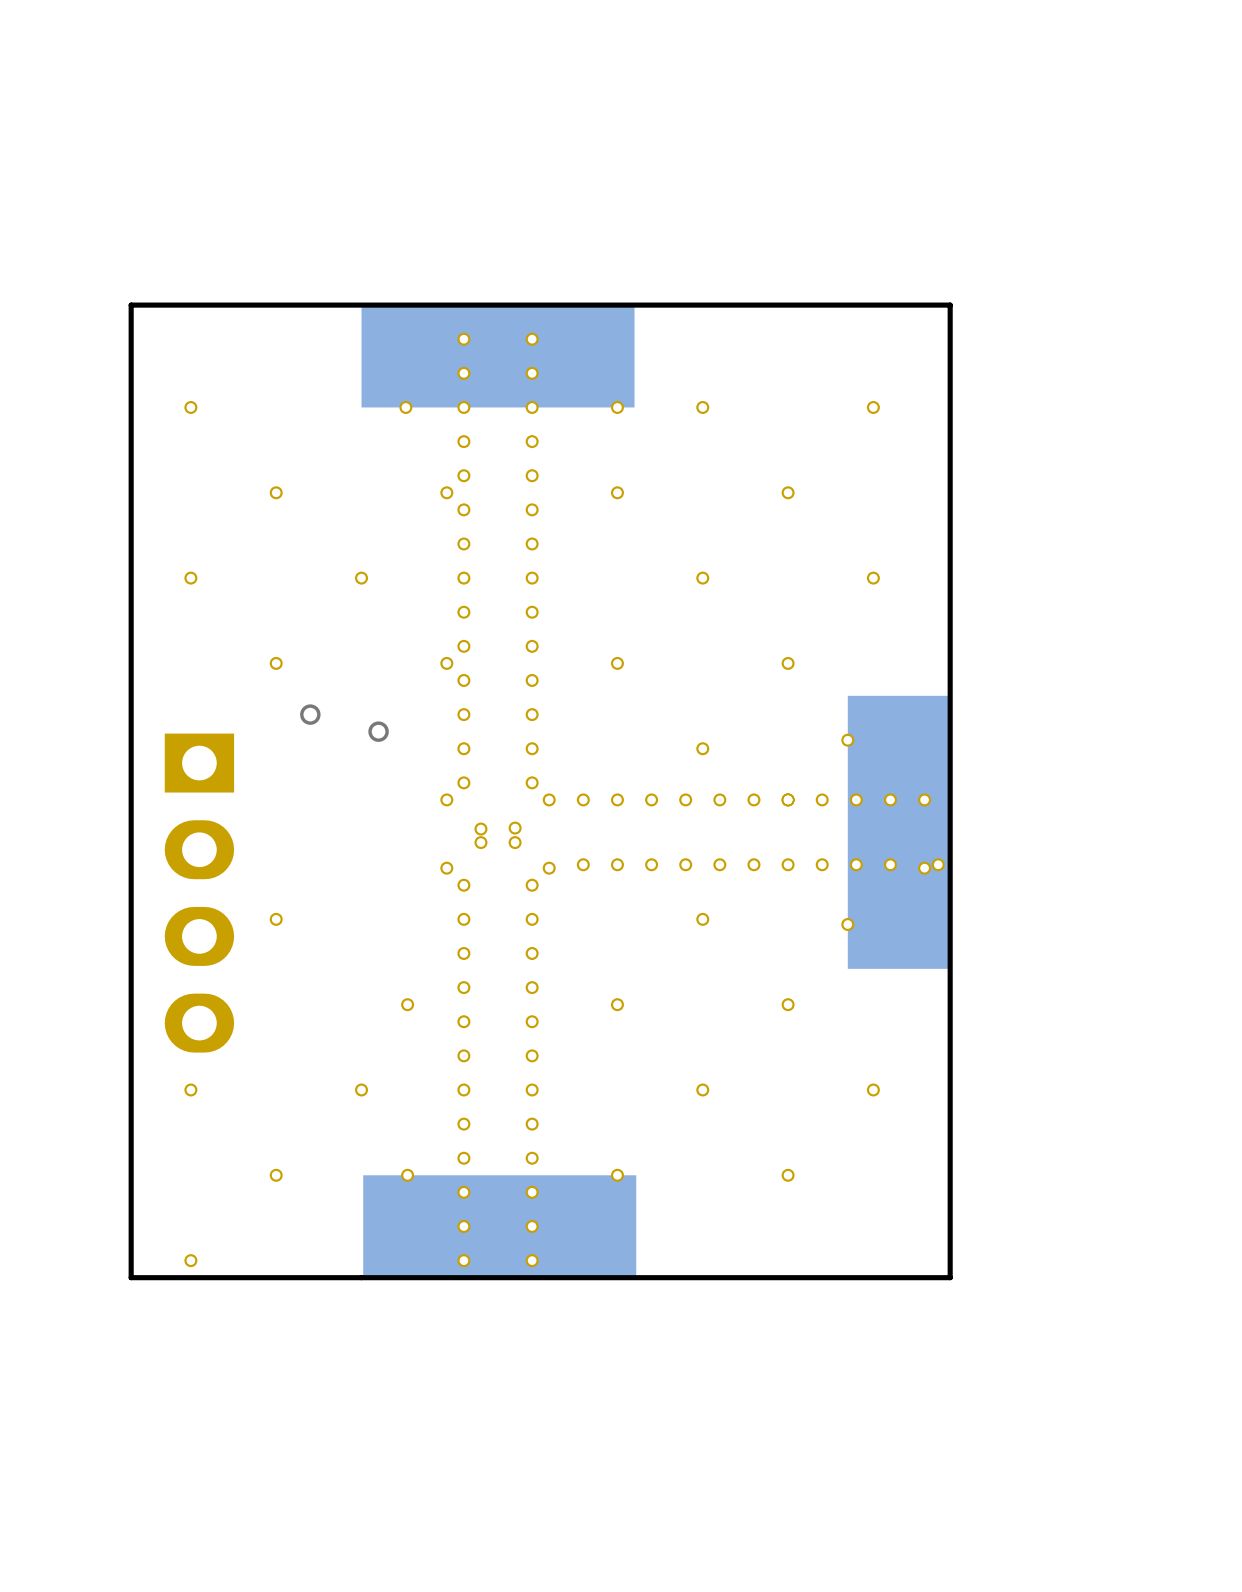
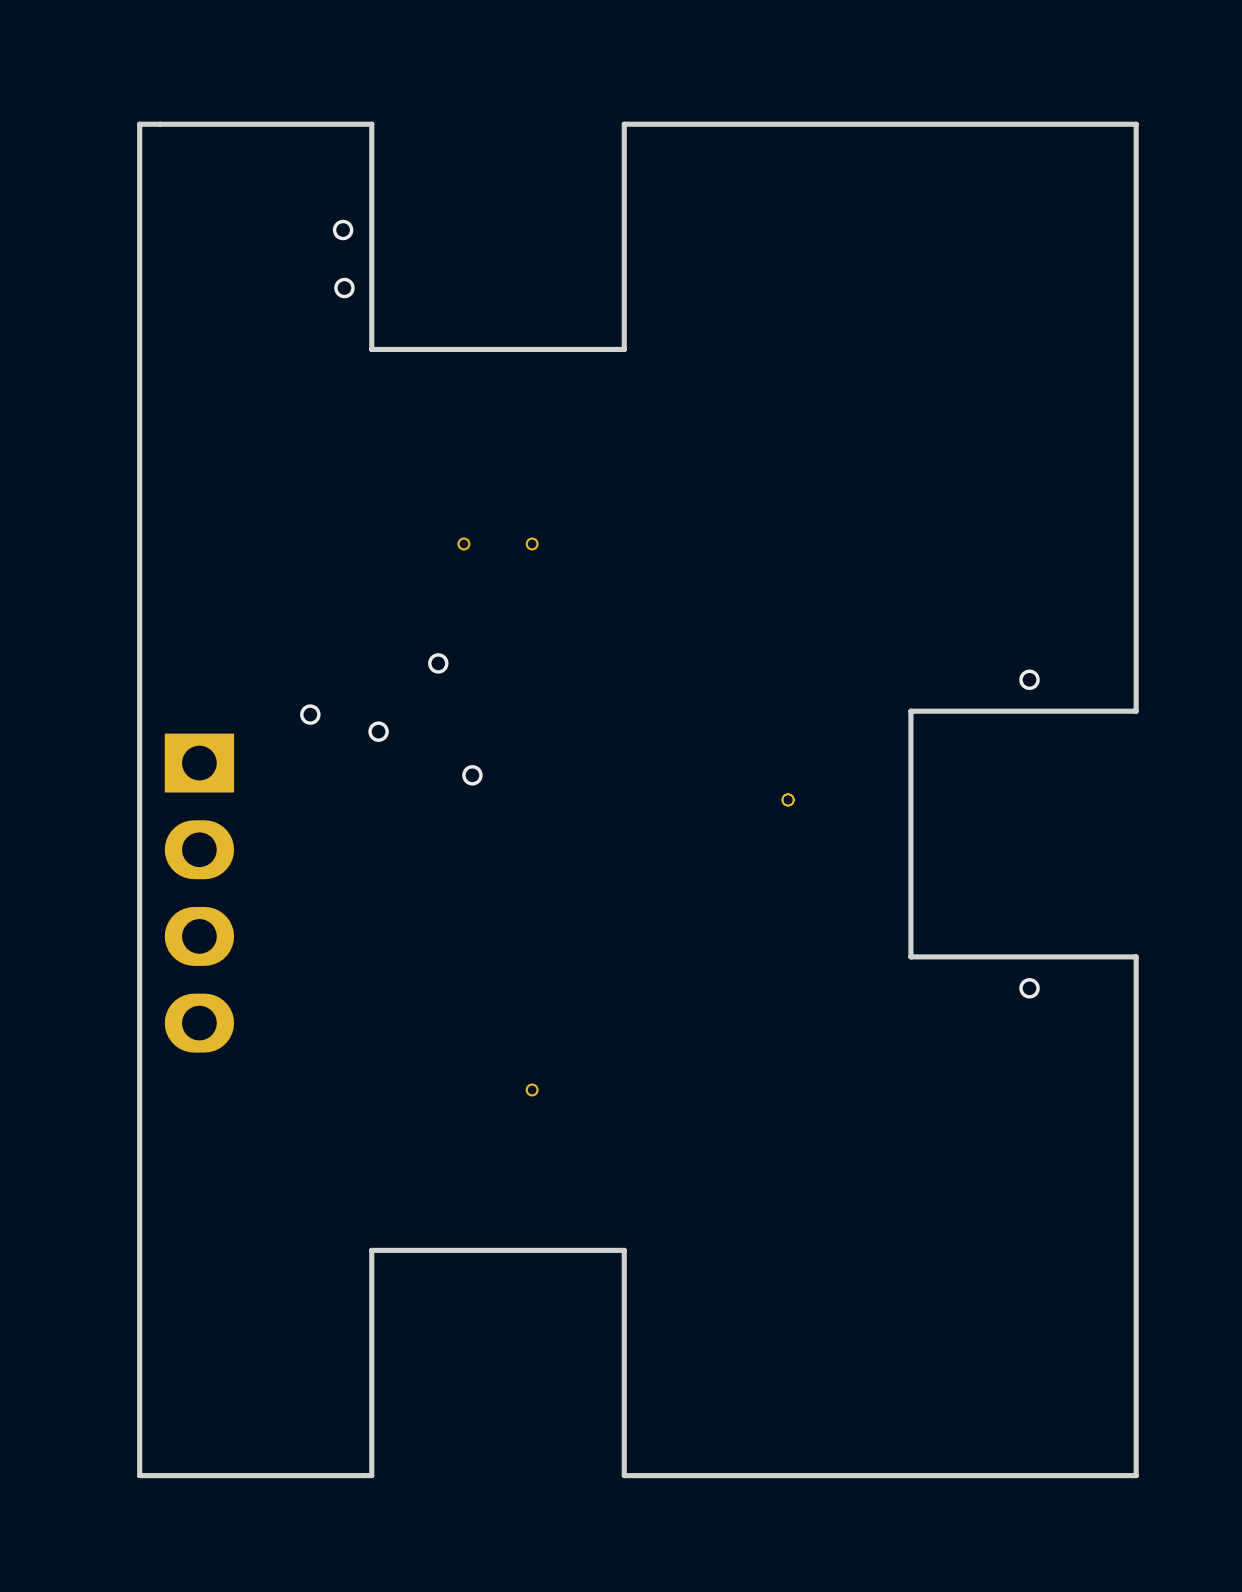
via: none -> (343, 230)
via: none -> (344, 288)
board edge: (950, 305) (950, 1277) (131, 1277) (131, 305) (950, 305) -> (1136, 124) (1136, 711) (910, 711) (910, 956) (1136, 956) (1136, 1475) (624, 1475) (624, 1250) (371, 1250) (371, 1475) (139, 1475) (139, 124) (371, 124) (371, 349) (624, 349) (624, 124) (1136, 124)
part: (463, 339) -> none
part: (532, 339) -> none
part: (498, 356) -> none
part: (463, 373) -> none
part: (532, 373) -> none
part: (190, 407) -> none
part: (405, 407) -> none
part: (463, 407) -> none
part: (532, 407) -> none
part: (617, 407) -> none
part: (702, 407) -> none
part: (873, 407) -> none
part: (463, 441) -> none
part: (532, 441) -> none
part: (463, 475) -> none
part: (532, 475) -> none
part: (276, 492) -> none
part: (446, 492) -> none
part: (617, 492) -> none
part: (788, 492) -> none
part: (463, 509) -> none
part: (532, 509) -> none
part: (190, 578) -> none
part: (361, 578) -> none
part: (463, 578) -> none
part: (532, 578) -> none
part: (702, 578) -> none
part: (873, 578) -> none
part: (463, 612) -> none
part: (532, 612) -> none
part: (463, 646) -> none
part: (532, 646) -> none
part: (276, 663) -> none
via: none -> (438, 663)
part: (446, 663) -> none
part: (617, 663) -> none
part: (788, 663) -> none
via: none -> (1029, 679)
part: (463, 680) -> none
part: (532, 680) -> none
part: (463, 714) -> none
part: (532, 714) -> none
part: (847, 740) -> none
part: (463, 748) -> none
part: (532, 748) -> none
part: (702, 748) -> none
via: none -> (472, 775)
part: (463, 782) -> none
part: (532, 782) -> none
part: (446, 799) -> none
part: (549, 799) -> none
part: (583, 799) -> none
part: (617, 799) -> none
part: (651, 799) -> none
part: (685, 799) -> none
part: (719, 799) -> none
part: (753, 799) -> none
part: (822, 799) -> none
part: (856, 799) -> none
part: (890, 799) -> none
part: (924, 799) -> none
part: (515, 828) -> none
part: (480, 829) -> none
part: (898, 832) -> none
part: (480, 842) -> none
part: (515, 842) -> none
part: (583, 864) -> none
part: (617, 864) -> none
part: (651, 864) -> none
part: (685, 864) -> none
part: (719, 864) -> none
part: (753, 864) -> none
part: (788, 864) -> none
part: (822, 864) -> none
part: (856, 864) -> none
part: (890, 864) -> none
part: (938, 864) -> none
part: (446, 868) -> none
part: (549, 868) -> none
part: (924, 868) -> none
part: (463, 885) -> none
part: (532, 885) -> none
part: (276, 919) -> none
part: (463, 919) -> none
part: (532, 919) -> none
part: (702, 919) -> none
part: (847, 924) -> none
part: (463, 953) -> none
part: (532, 953) -> none
part: (463, 987) -> none
part: (532, 987) -> none
via: none -> (1029, 988)
part: (407, 1004) -> none
part: (617, 1004) -> none
part: (788, 1004) -> none
part: (463, 1021) -> none
part: (532, 1021) -> none
part: (463, 1055) -> none
part: (532, 1055) -> none
part: (190, 1089) -> none
part: (361, 1089) -> none
part: (463, 1089) -> none
part: (702, 1089) -> none
part: (873, 1089) -> none
part: (463, 1124) -> none
part: (532, 1124) -> none
part: (463, 1158) -> none
part: (532, 1158) -> none
part: (276, 1175) -> none
part: (407, 1175) -> none
part: (617, 1175) -> none
part: (788, 1175) -> none
part: (463, 1192) -> none
part: (532, 1192) -> none
part: (463, 1226) -> none
part: (499, 1226) -> none
part: (532, 1226) -> none
part: (190, 1260) -> none
part: (463, 1260) -> none
part: (532, 1260) -> none

